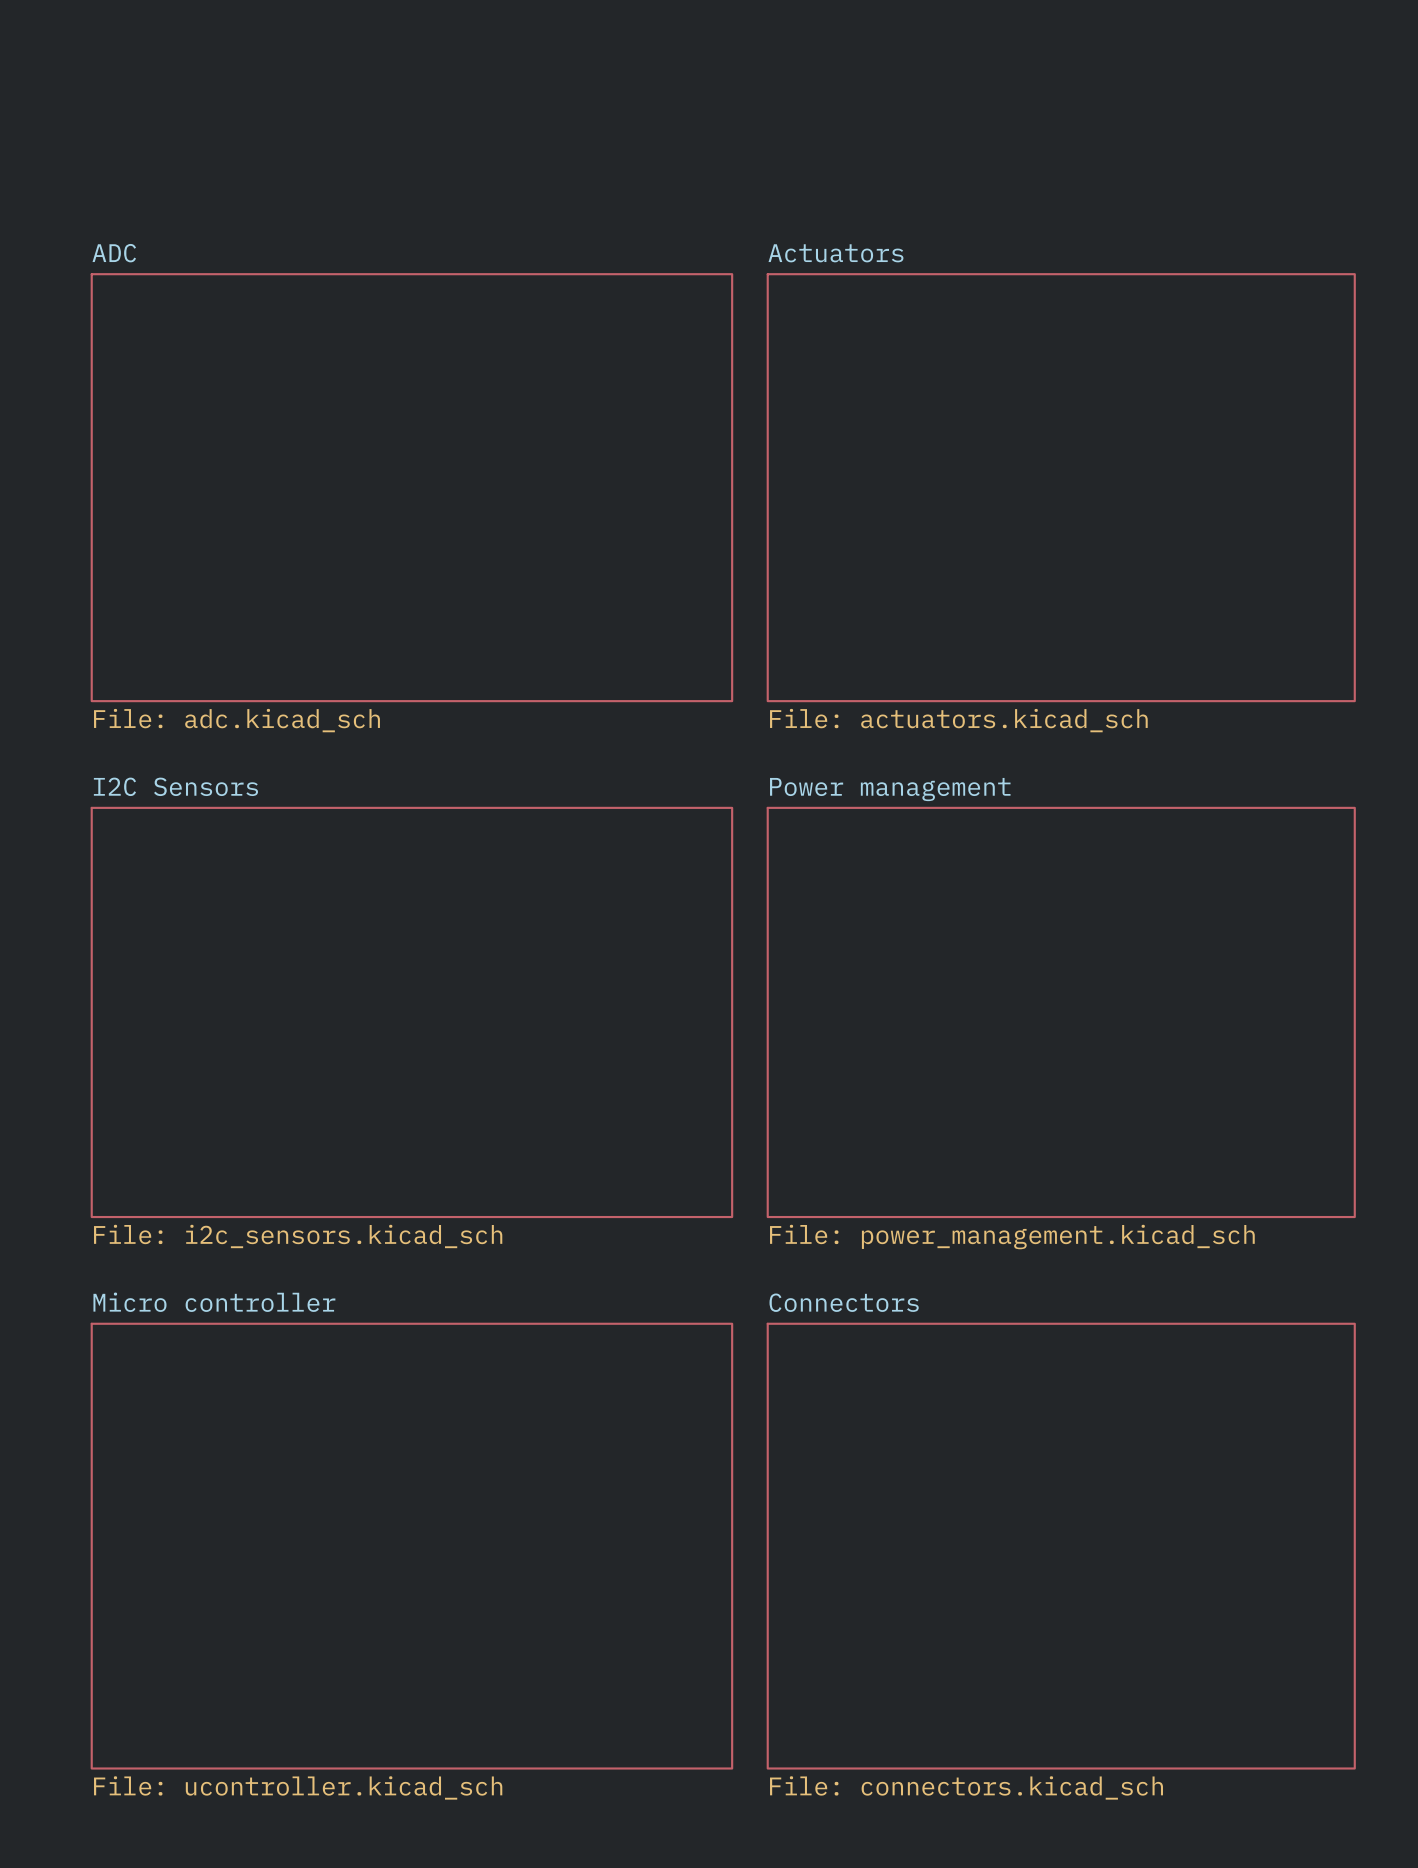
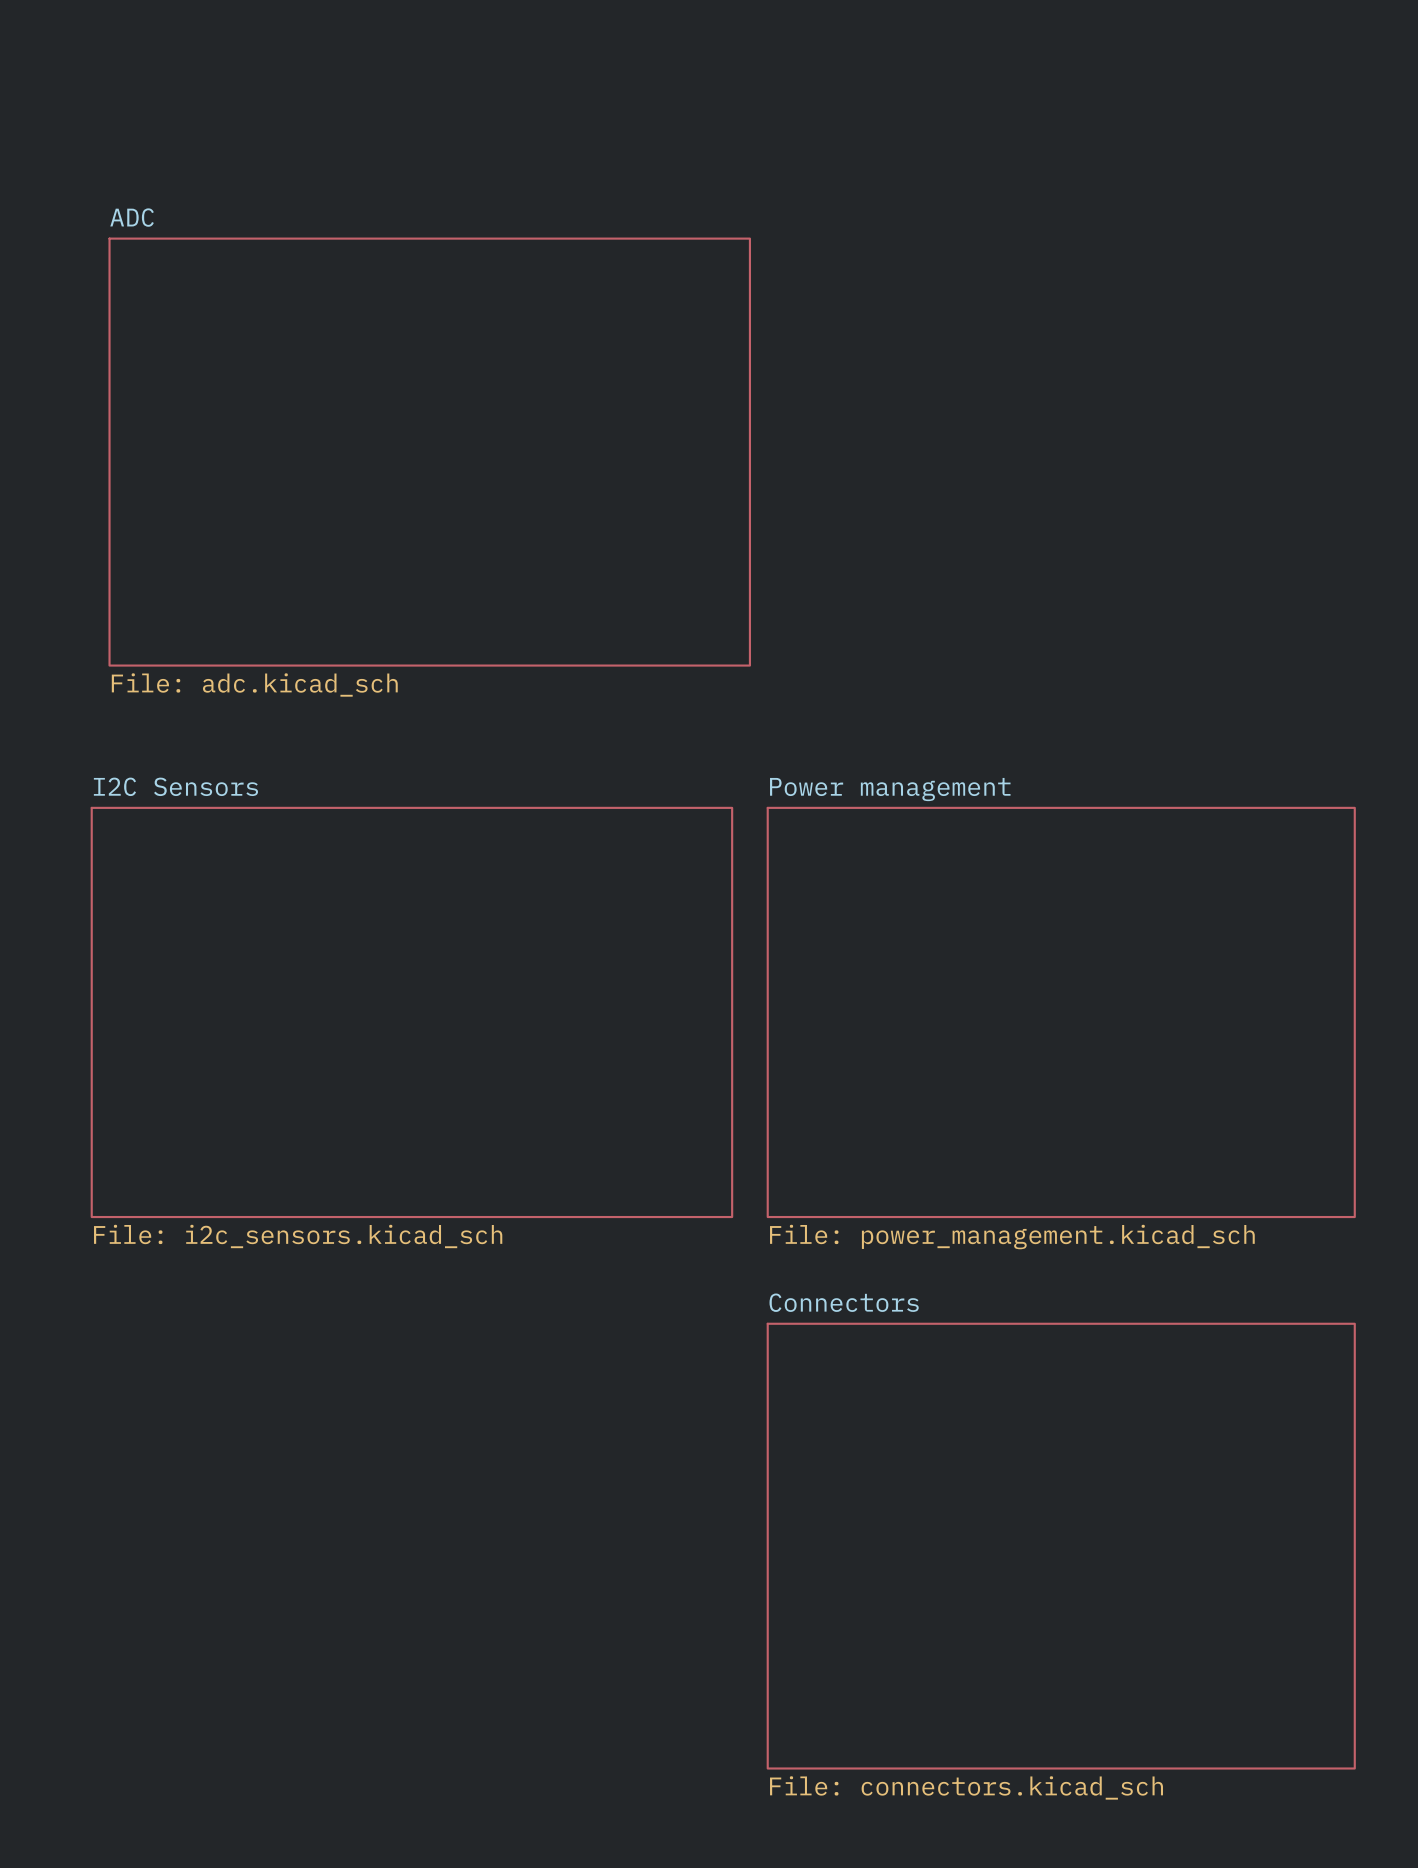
sheet ADC position: (411, 487) -> (429, 452)
sheet Actuators: File: actuators.kicad_sch (1061, 487) -> none
sheet Micro controller: File: ucontroller.kicad_sch (411, 1546) -> none

